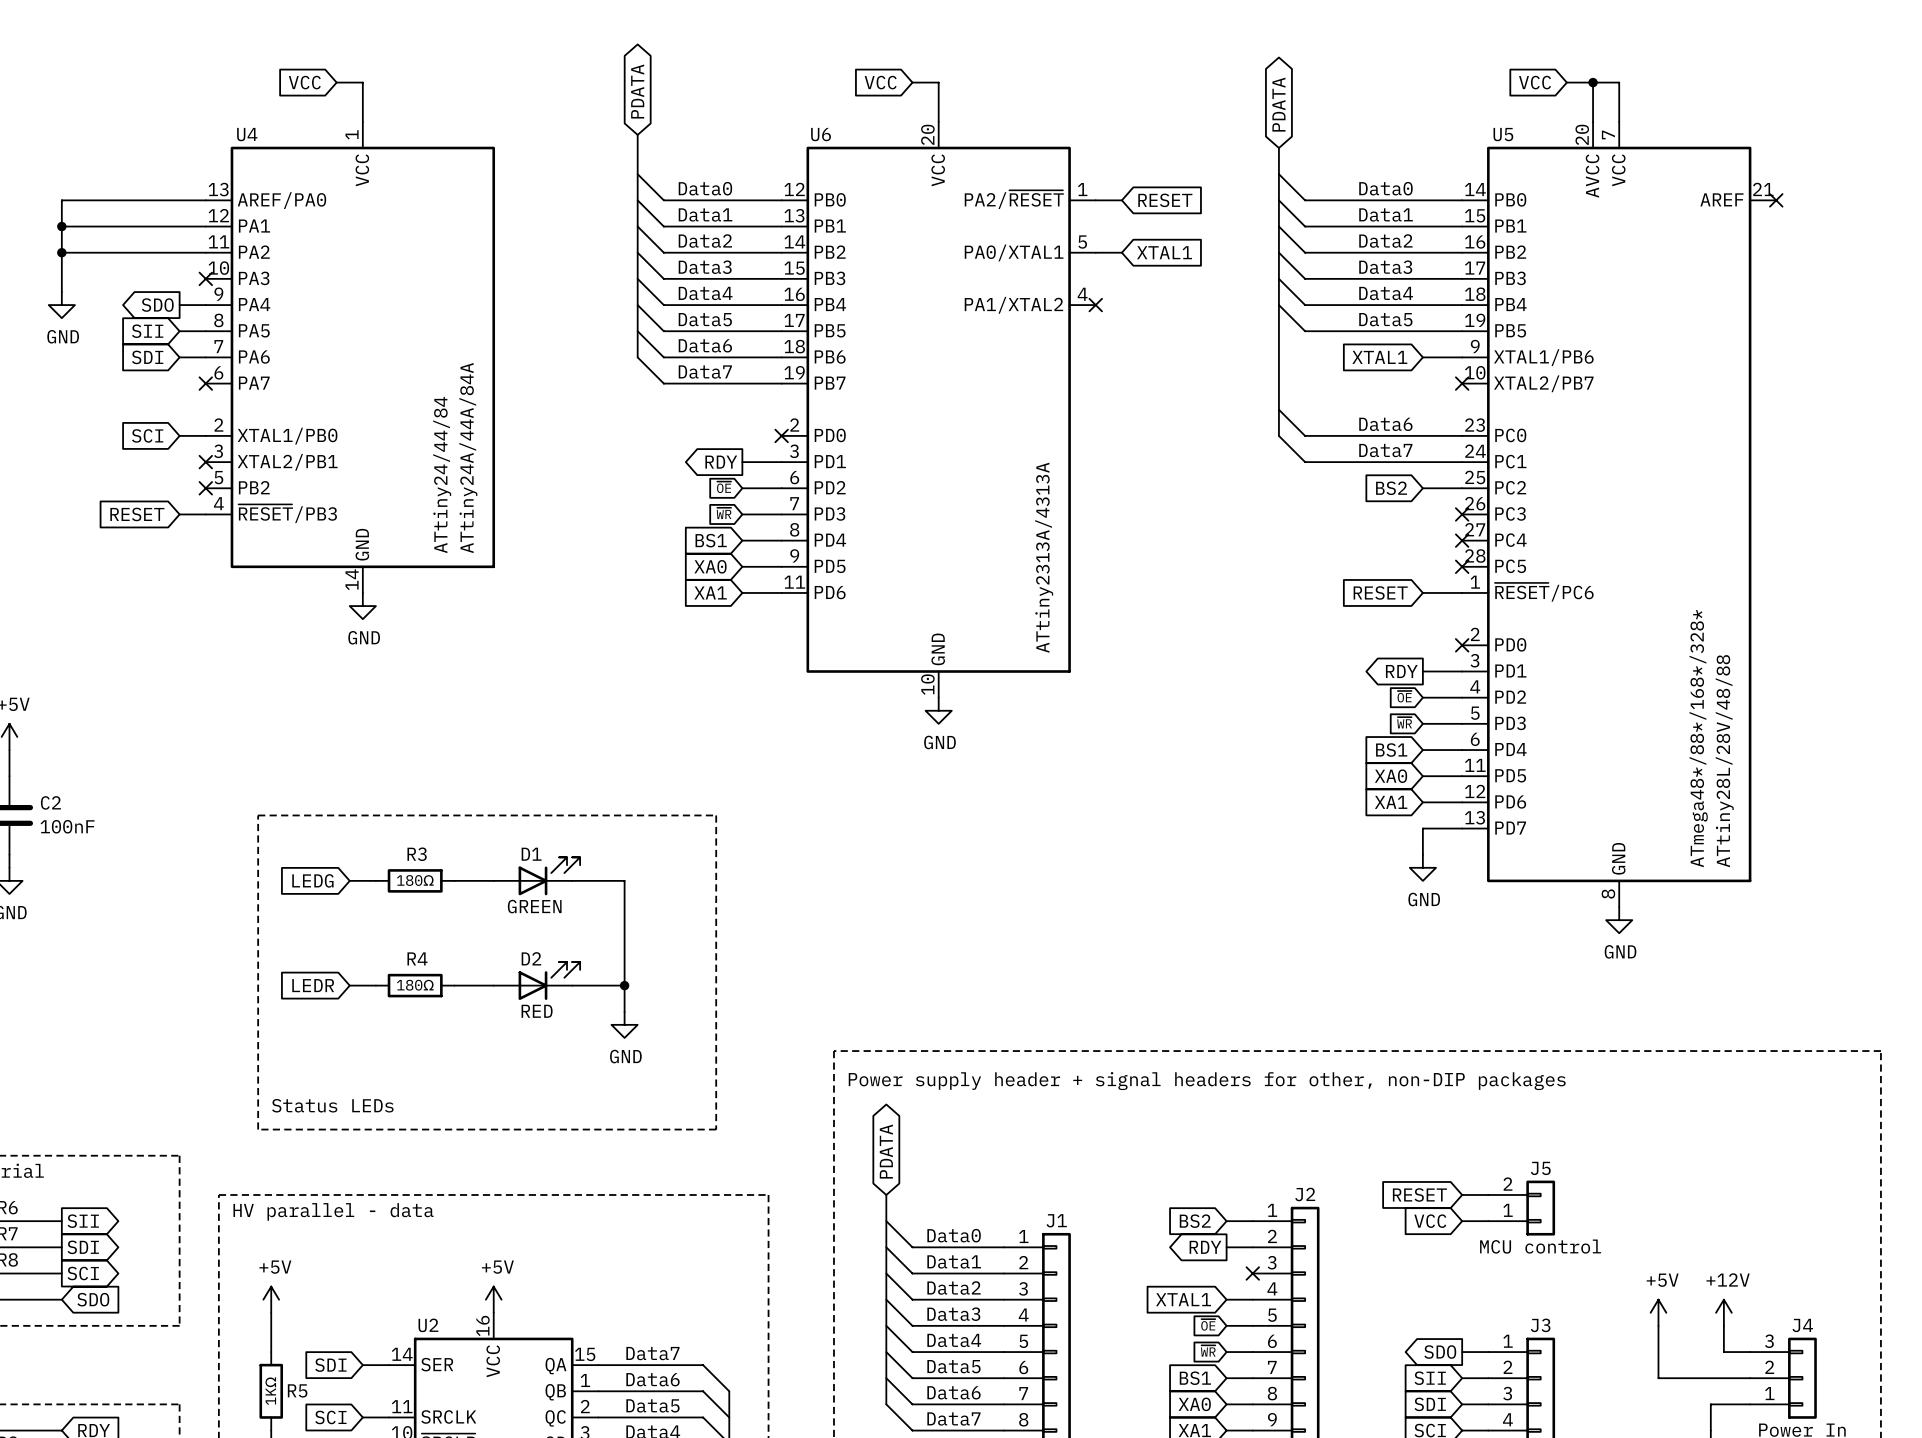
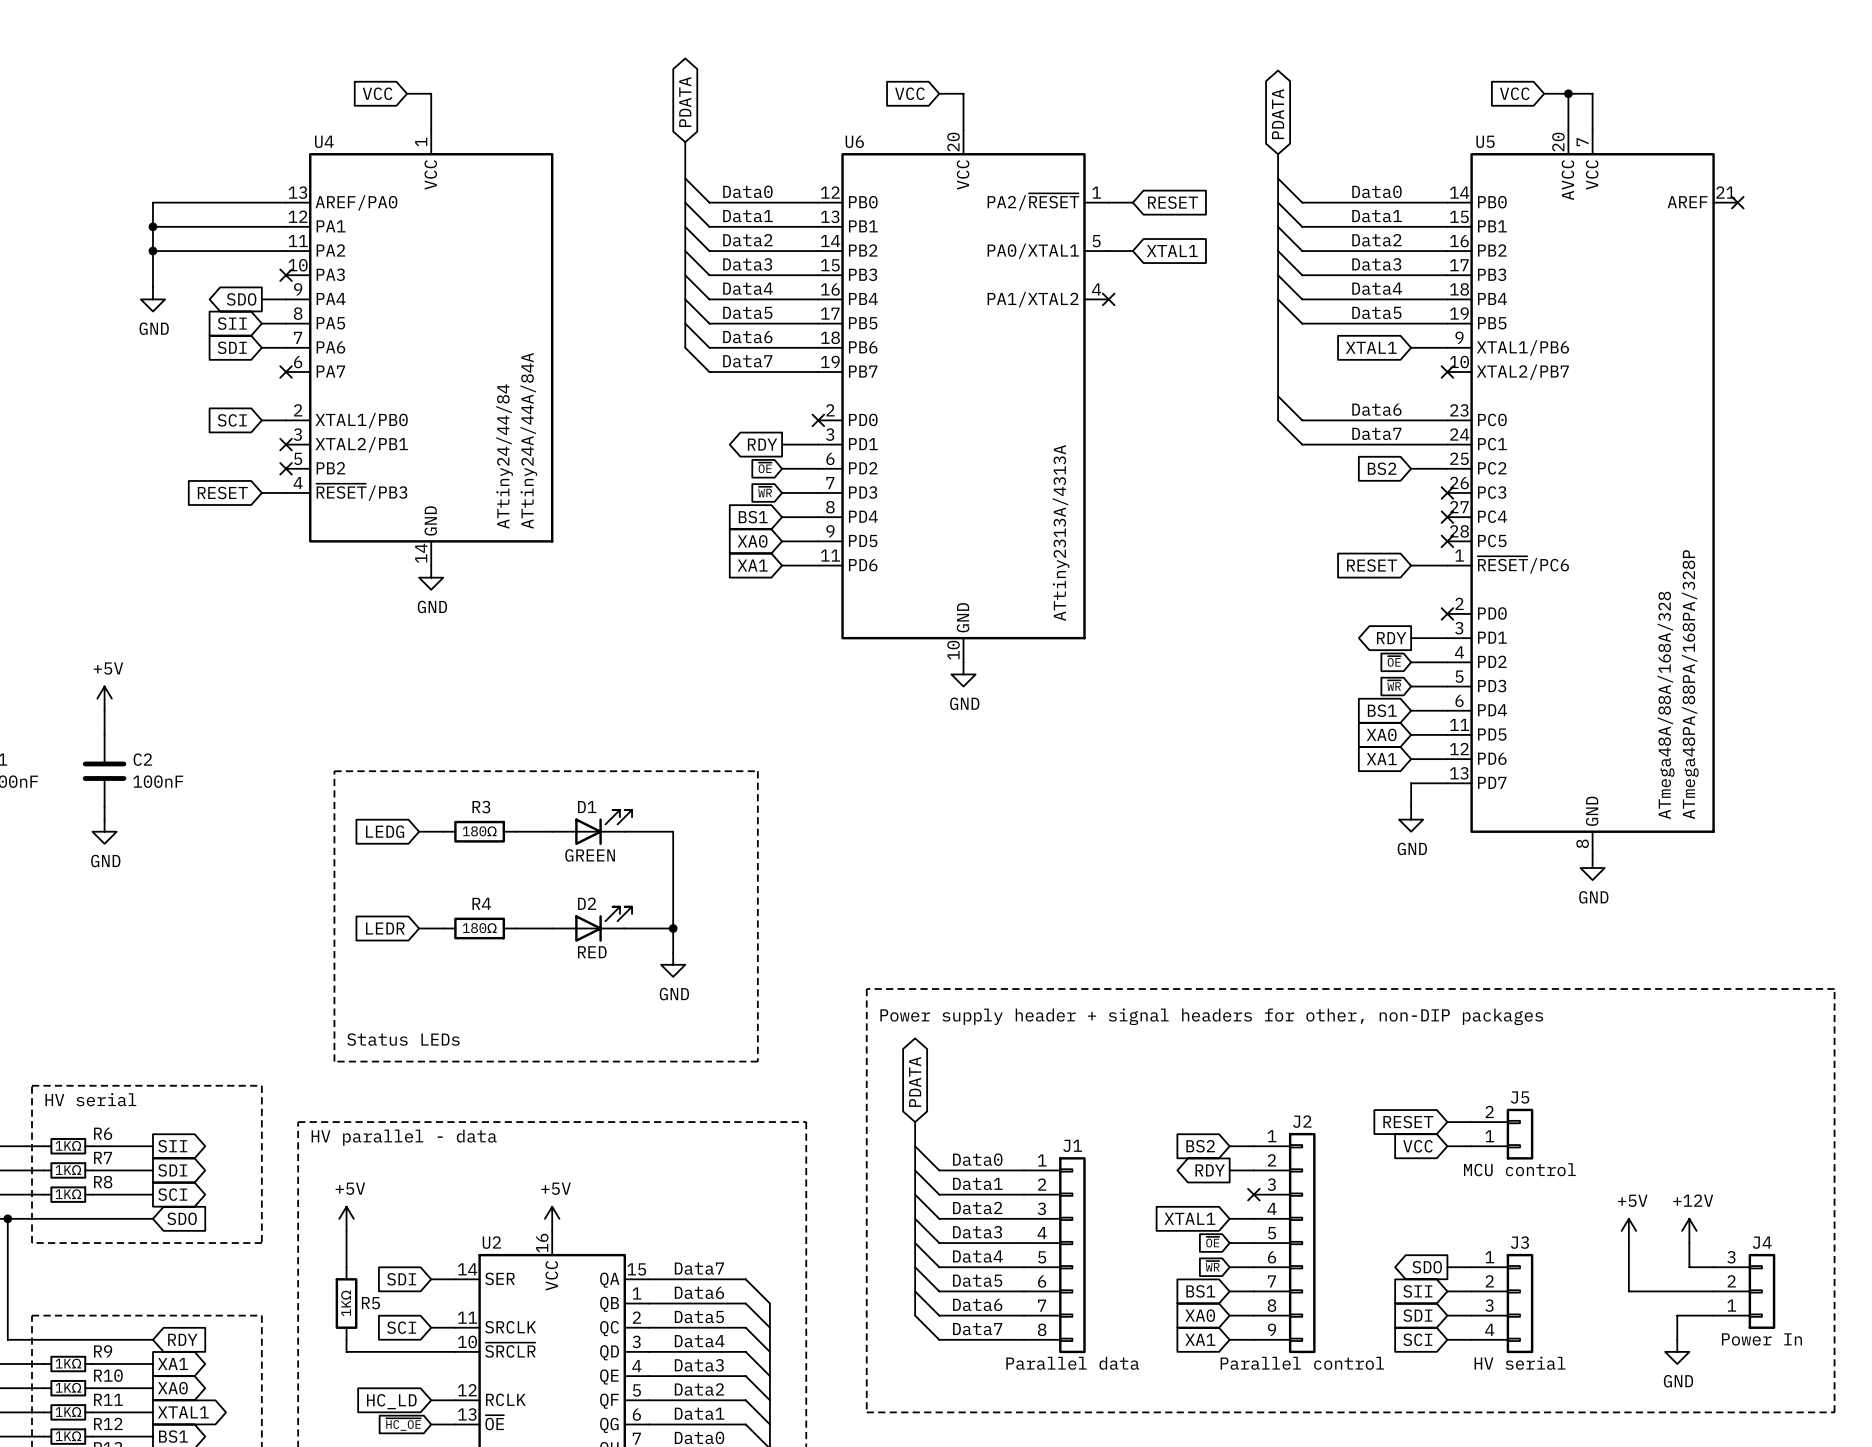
U5 value: ATmega48*/88*/168*/328* (1698, 738) -> ATmega48A/88A/168A/328 (1666, 705)
U5 text: ATtiny28L/28V/48/88 (1724, 761) -> ATmega48PA/88PA/168PA/328P (1690, 684)

